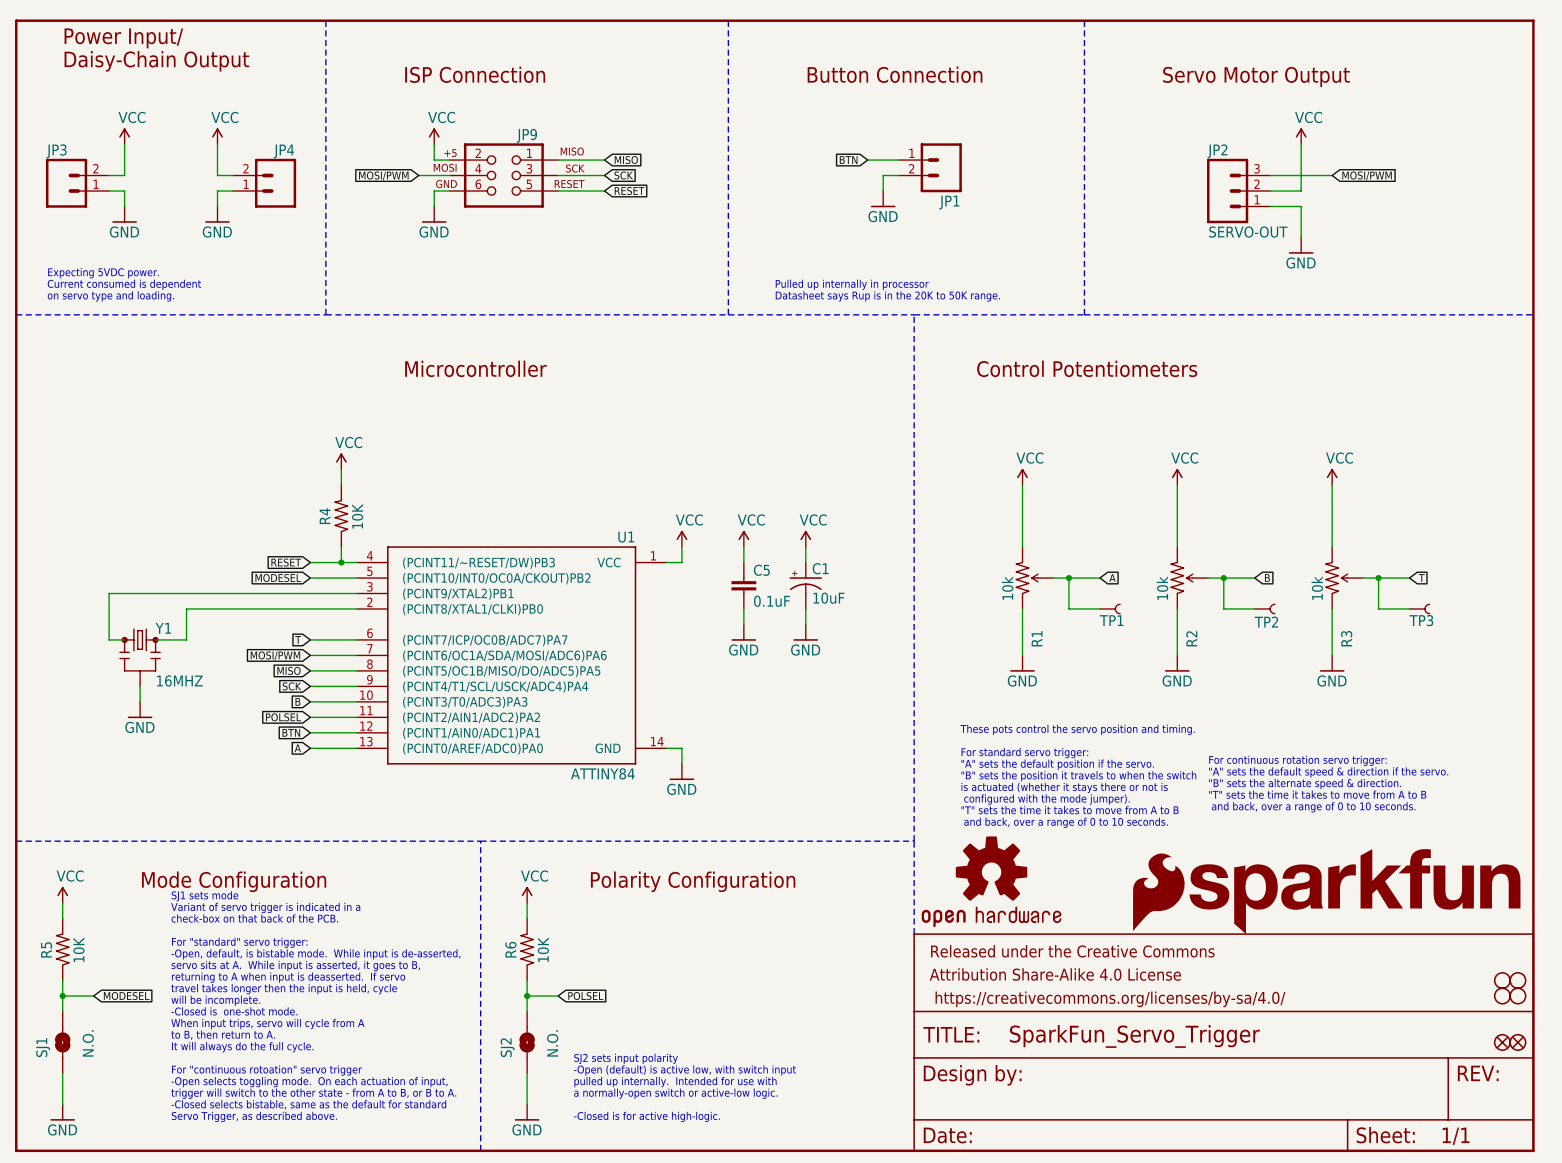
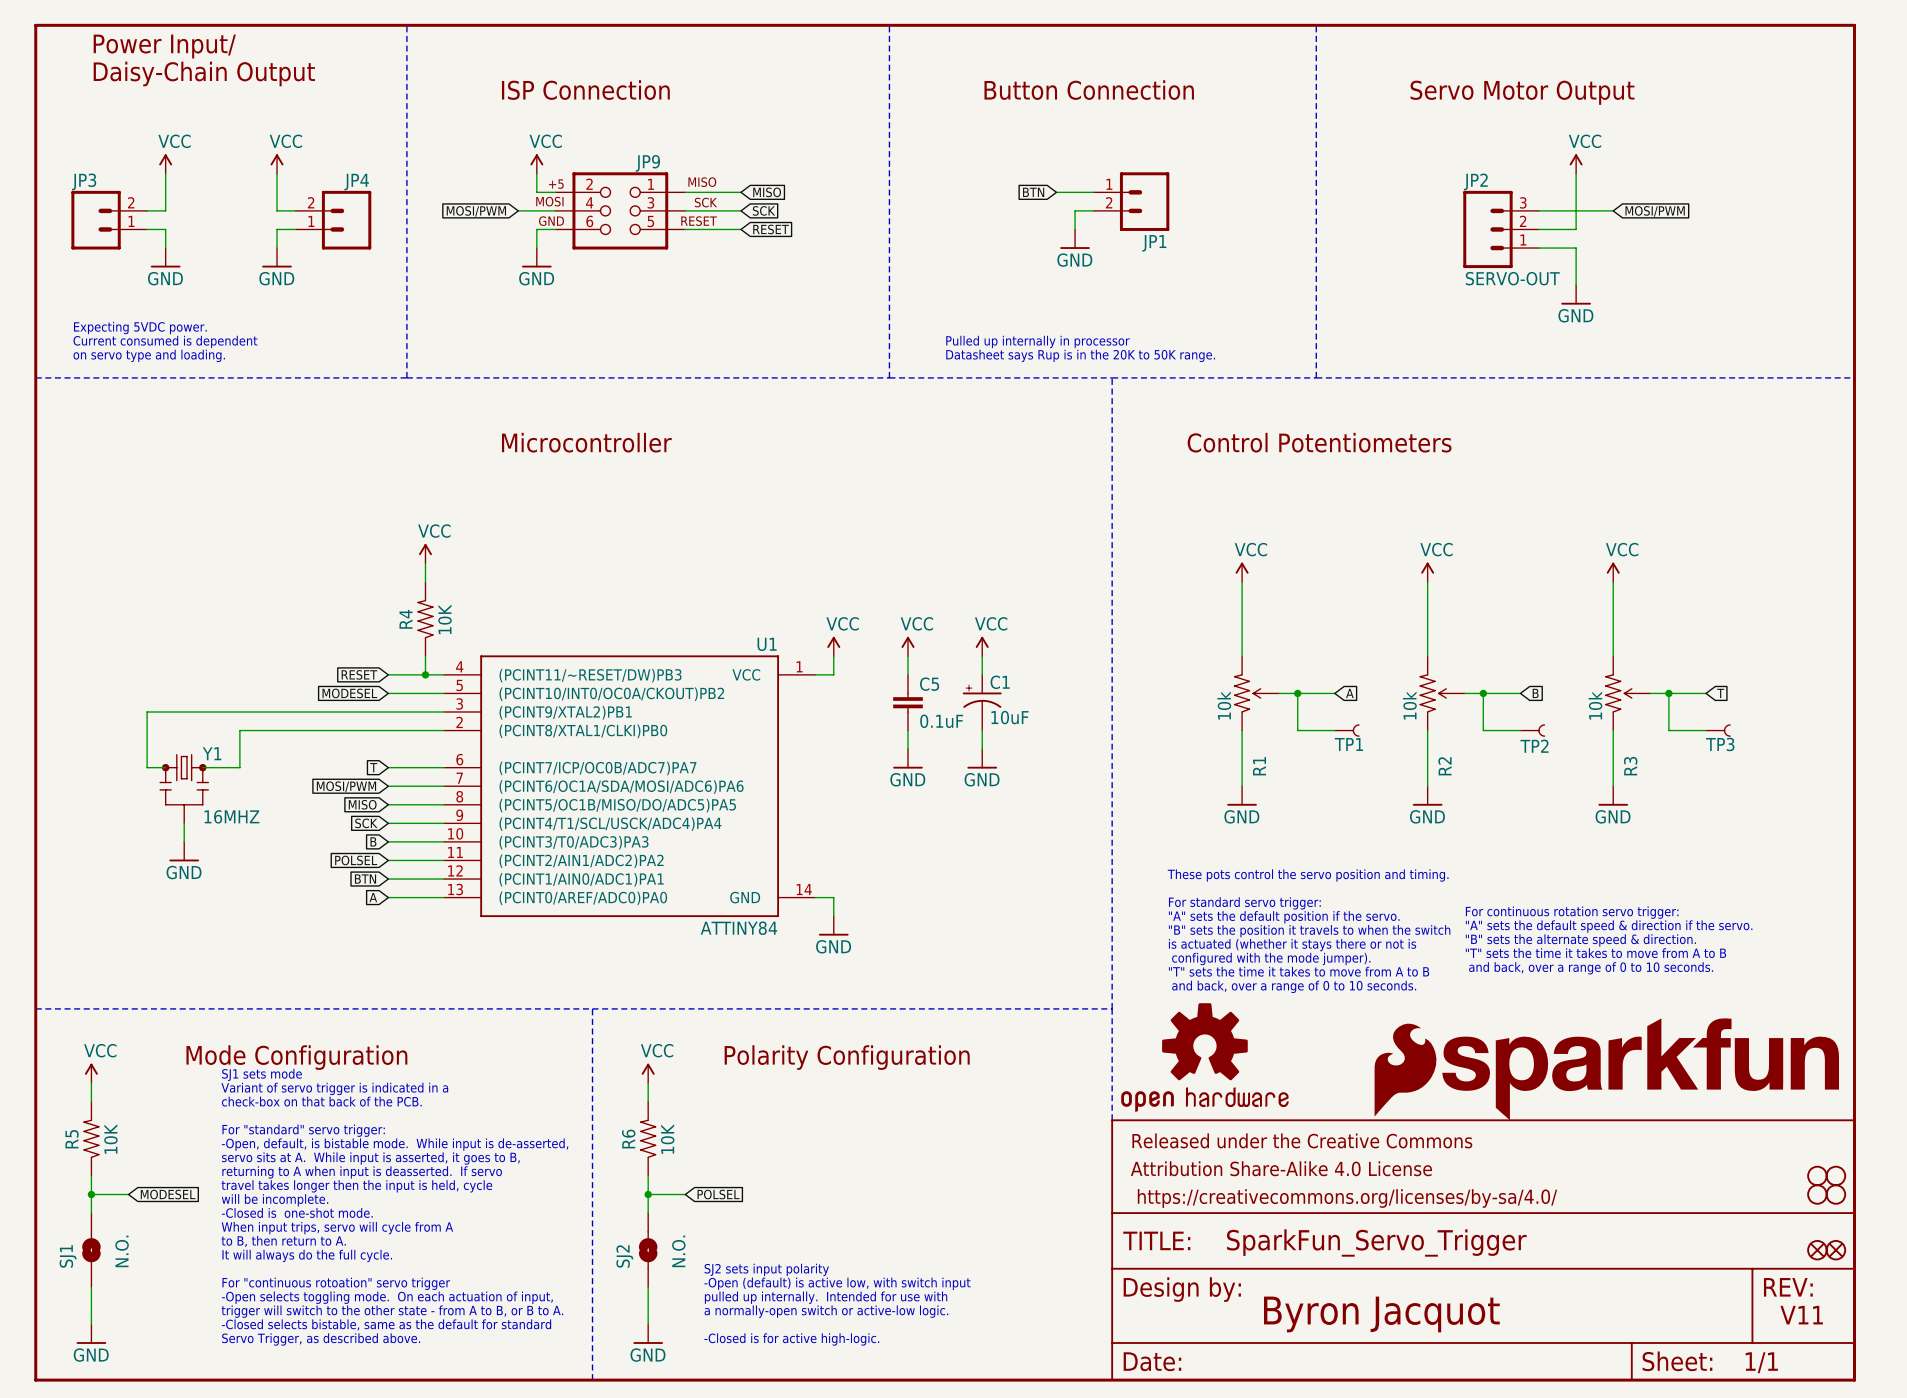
text: none -> Byron Jacquot (1381, 1314)
text: none -> V11 (1801, 1315)

